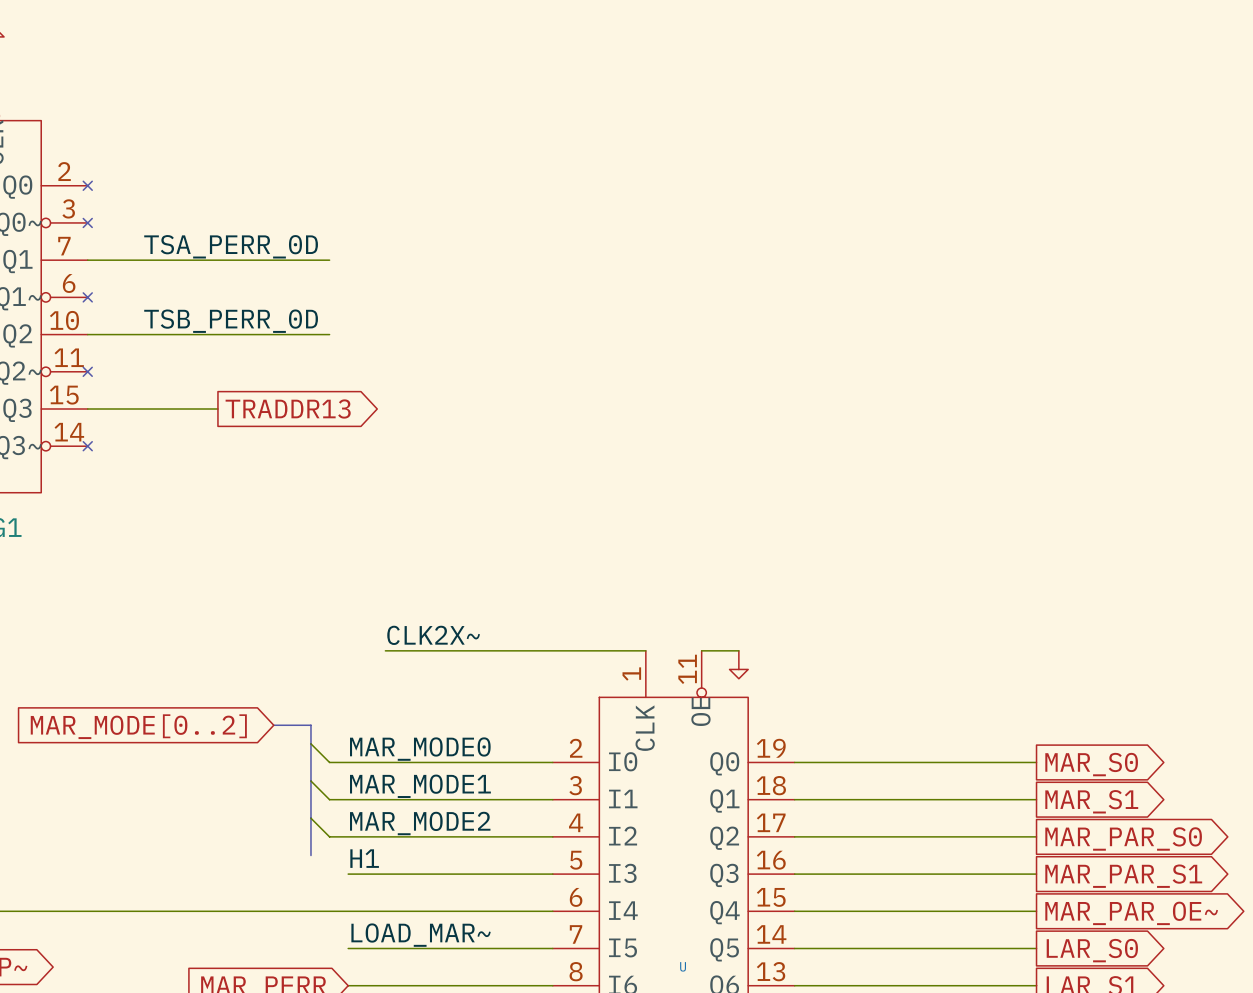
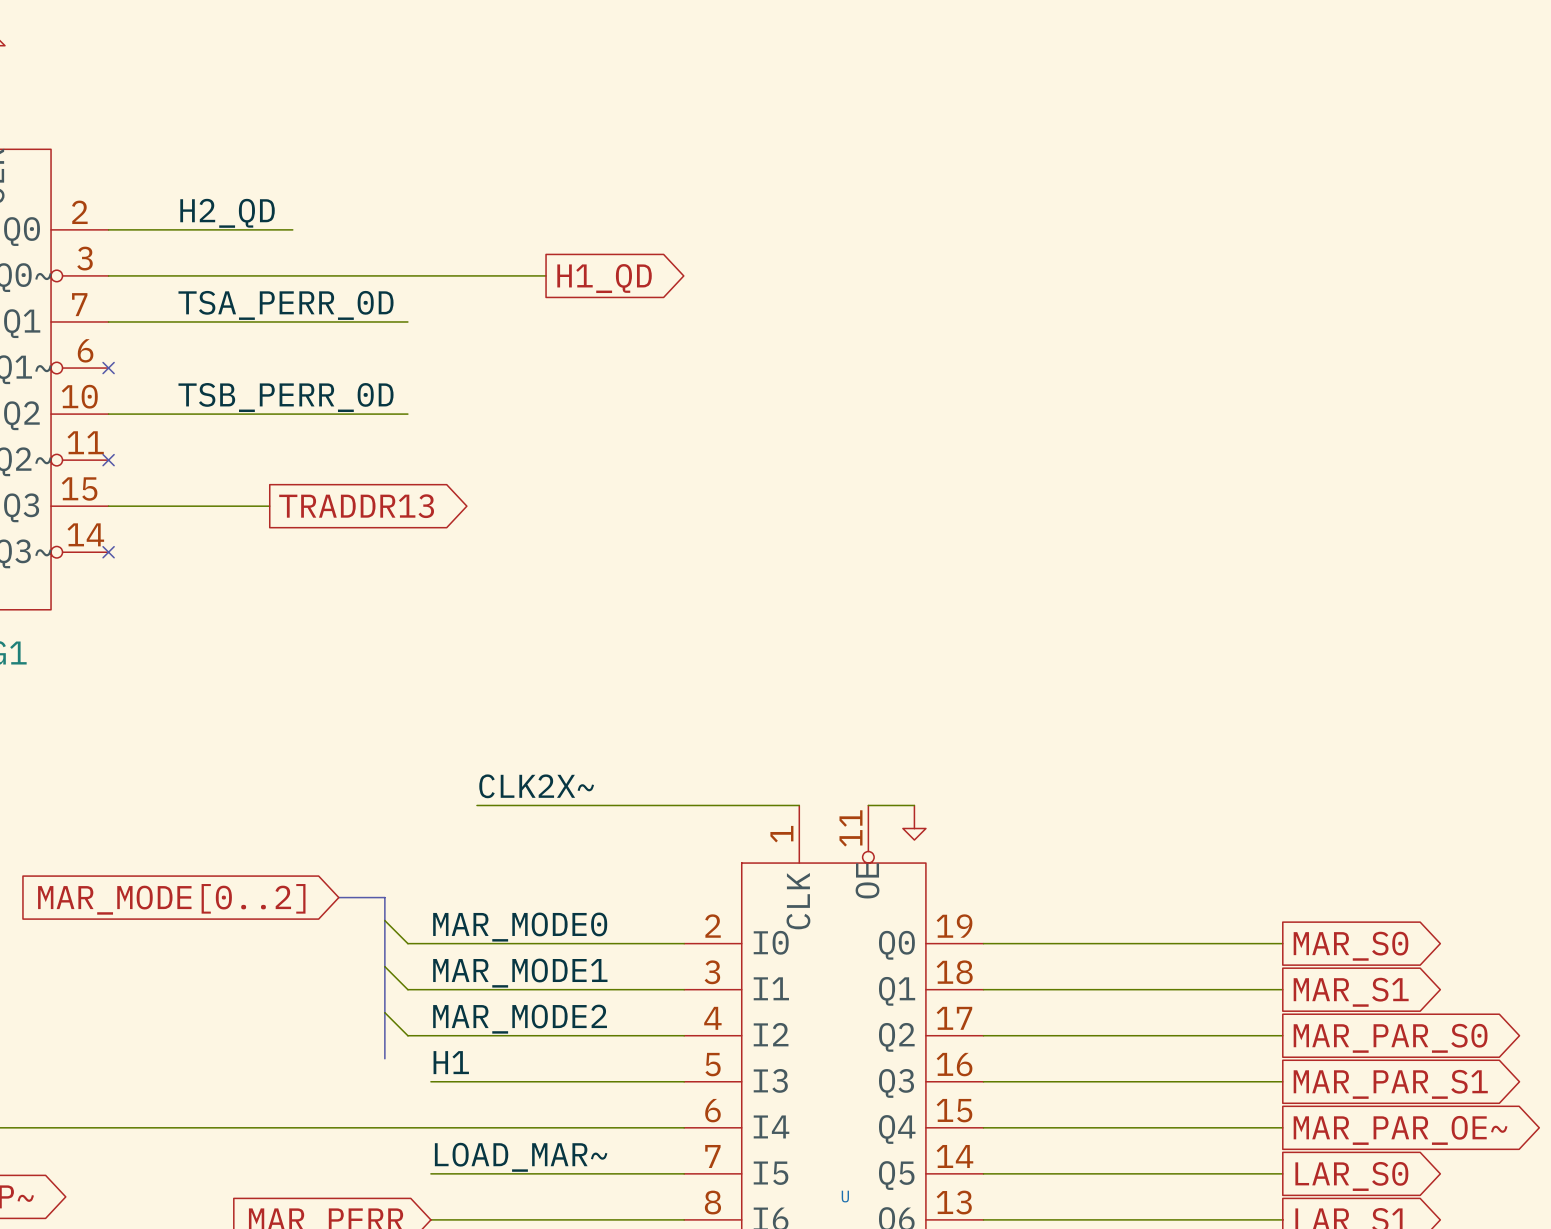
label: none -> H2_QD (227, 213)
wire: none -> (108, 229) (292, 229)
no-connect mark: (87, 185) -> none
wire: none -> (108, 275) (546, 275)
no-connect mark: (87, 222) -> none
global label: none -> H1_QD (604, 278)

